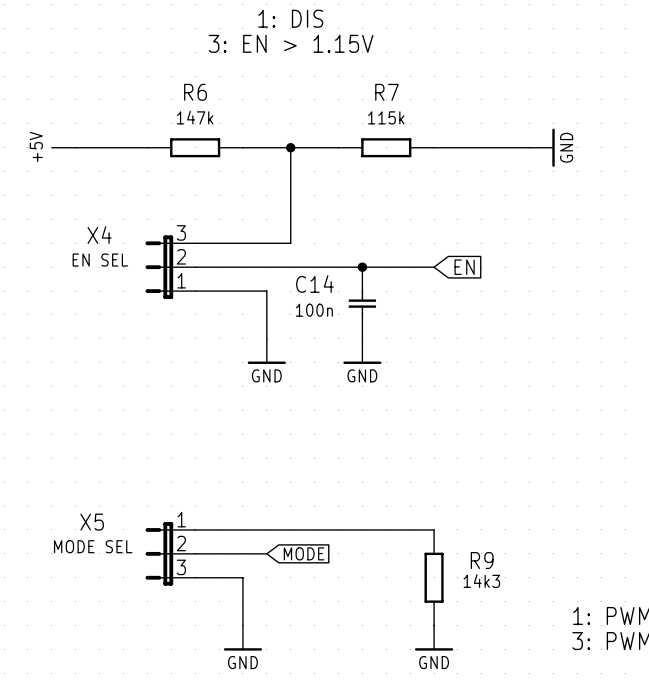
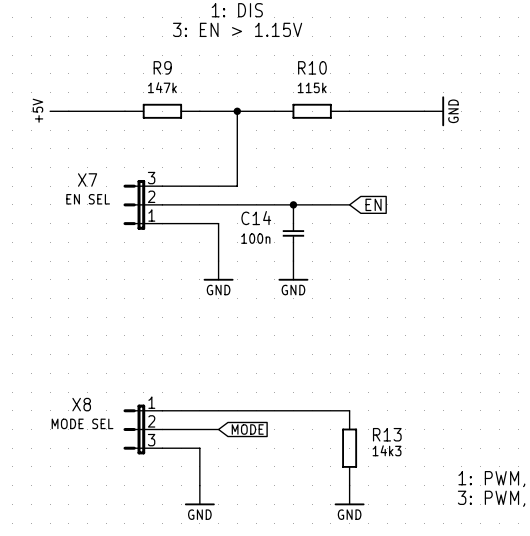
R6 name: R6 (195, 92) -> R9 (162, 67)
R7 name: R7 (386, 92) -> R10 (312, 67)
X4 name: X4 (99, 235) -> X7 (87, 179)
X5 name: X5 (92, 522) -> X8 (81, 404)
R9 name: R9 (482, 560) -> R13 (387, 434)

